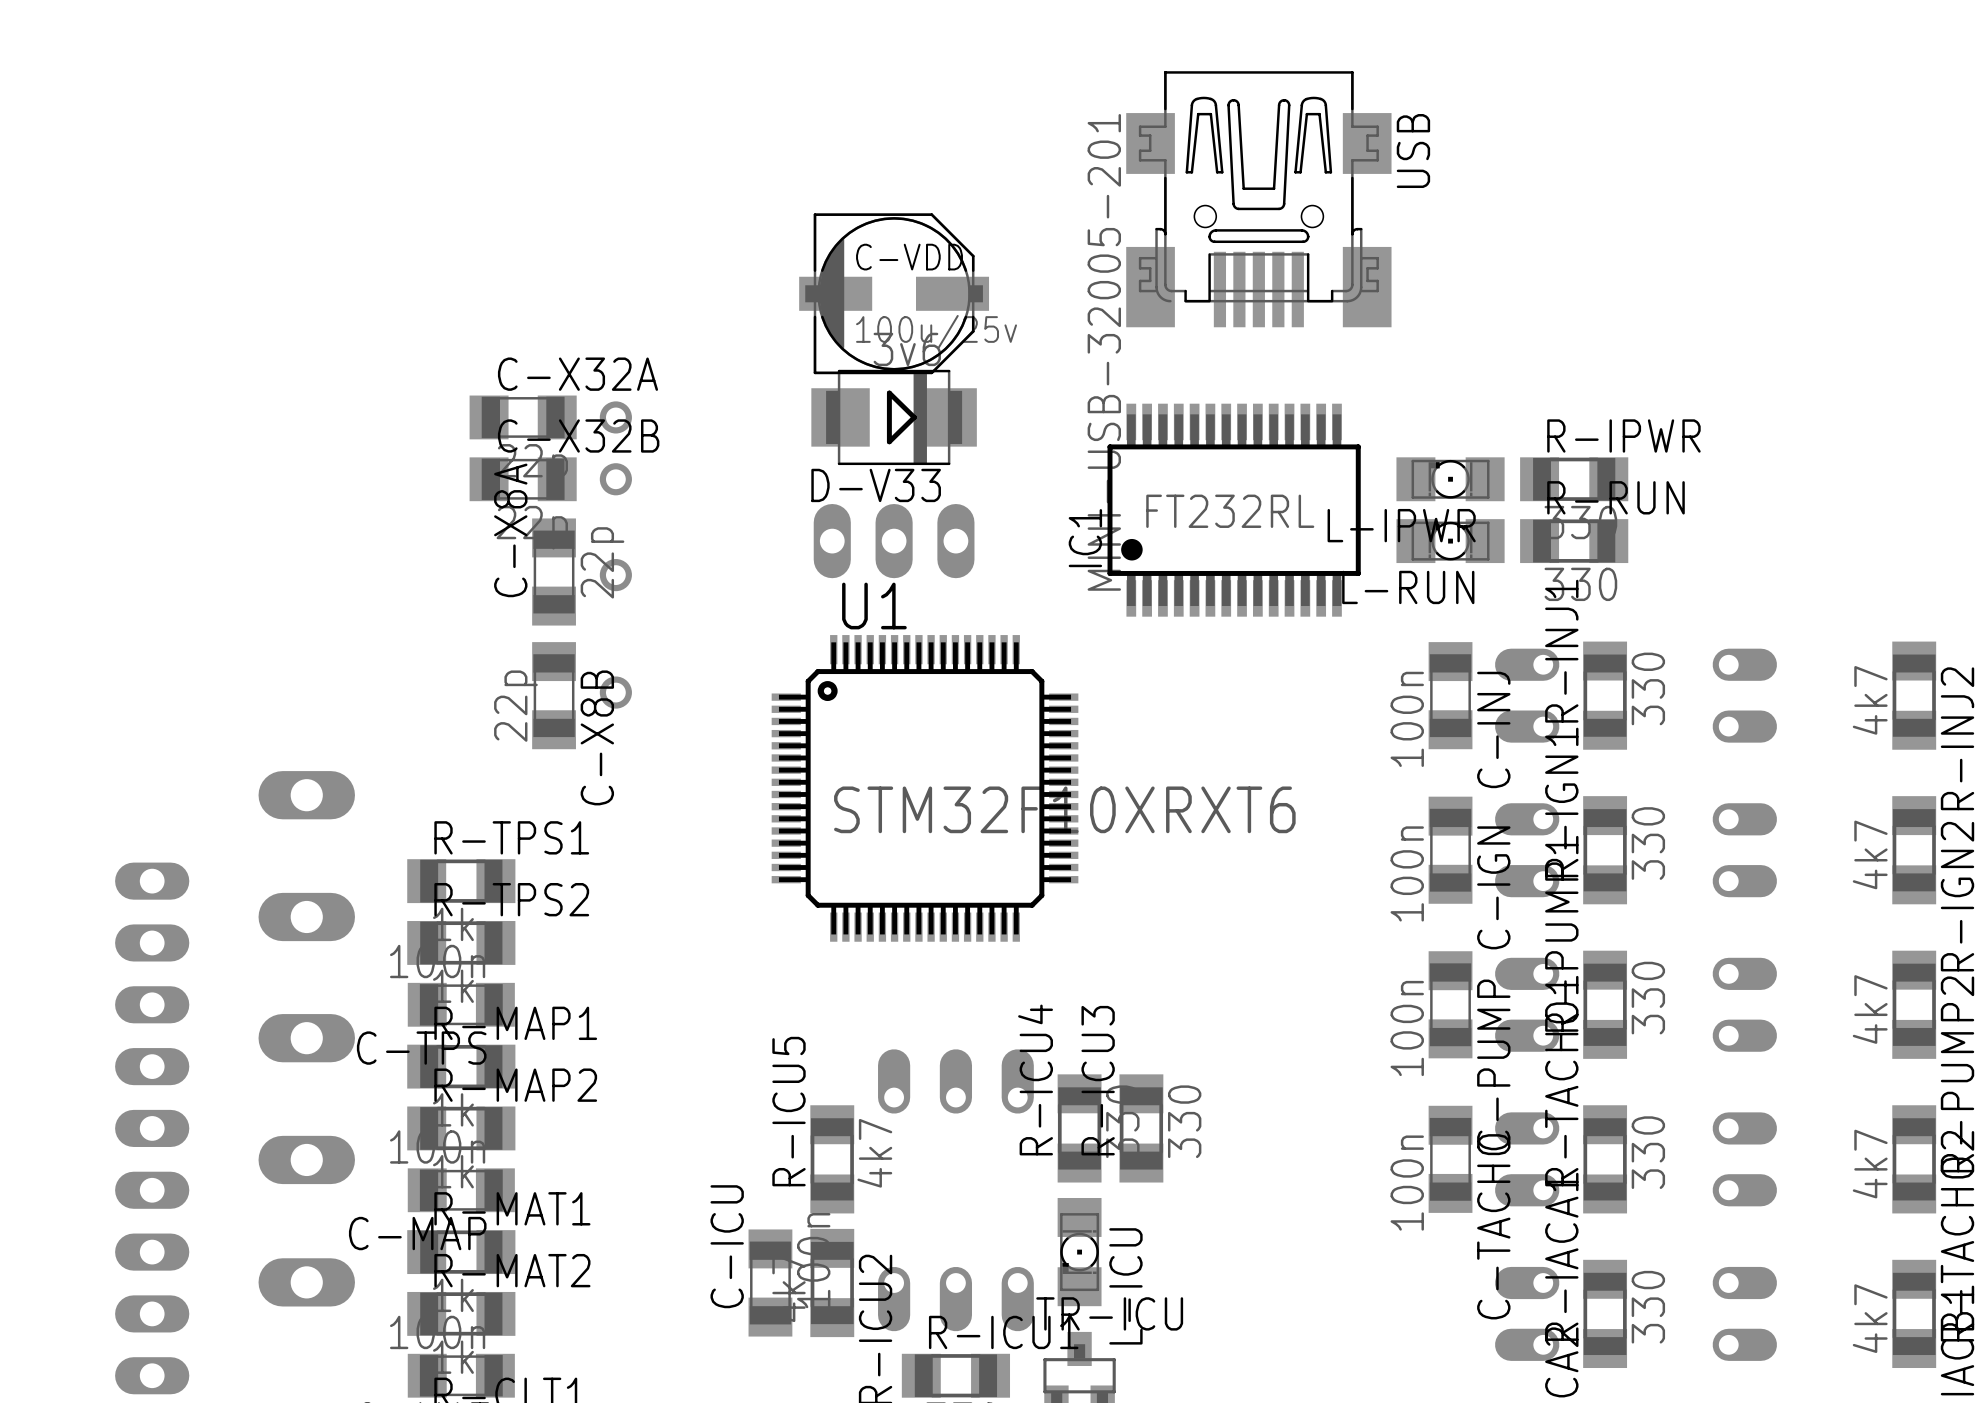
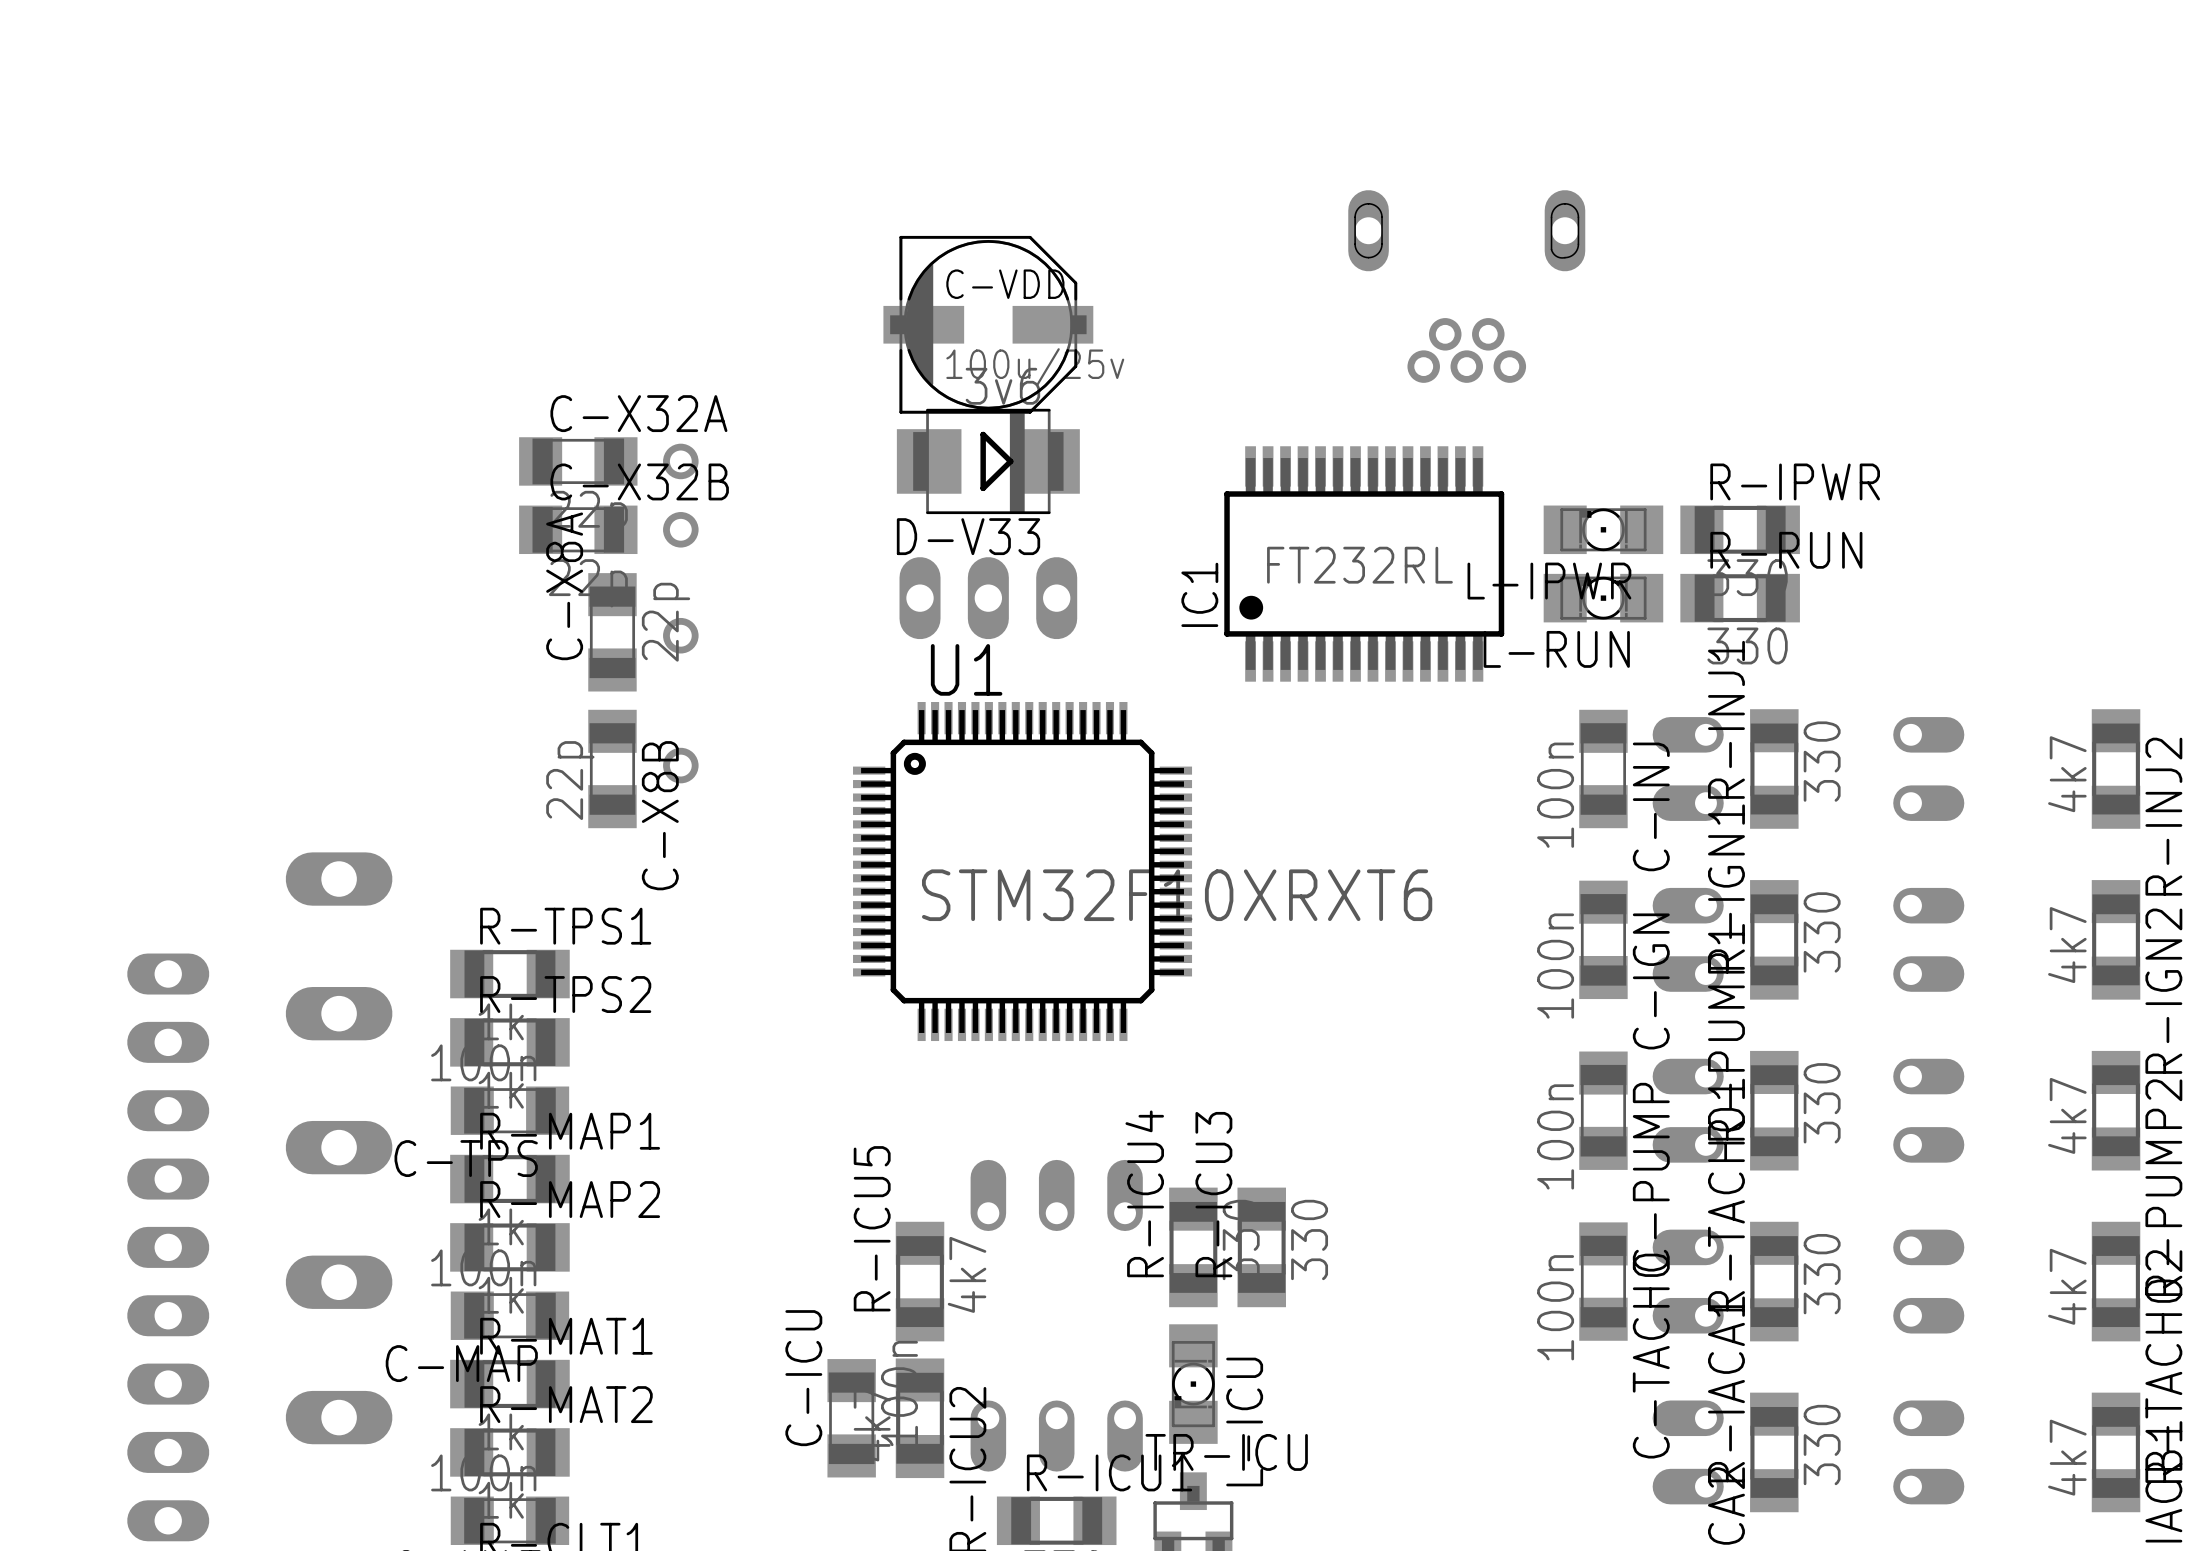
USB: MINI-USB-32005-201 (1258, 199) -> none
part: none -> (1466, 286)

